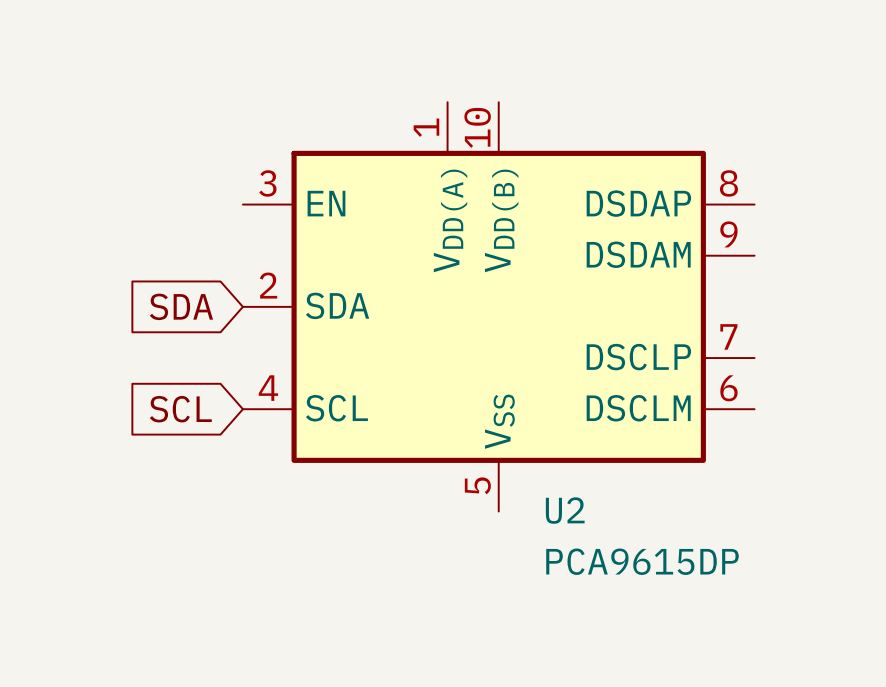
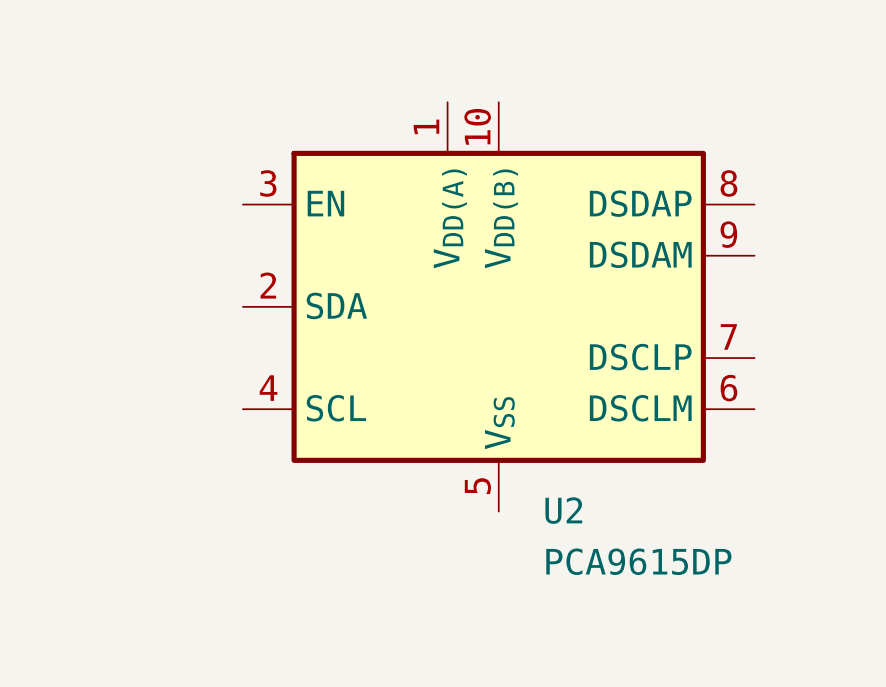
global label: SDA (181, 306) -> none
global label: SCL (180, 409) -> none

